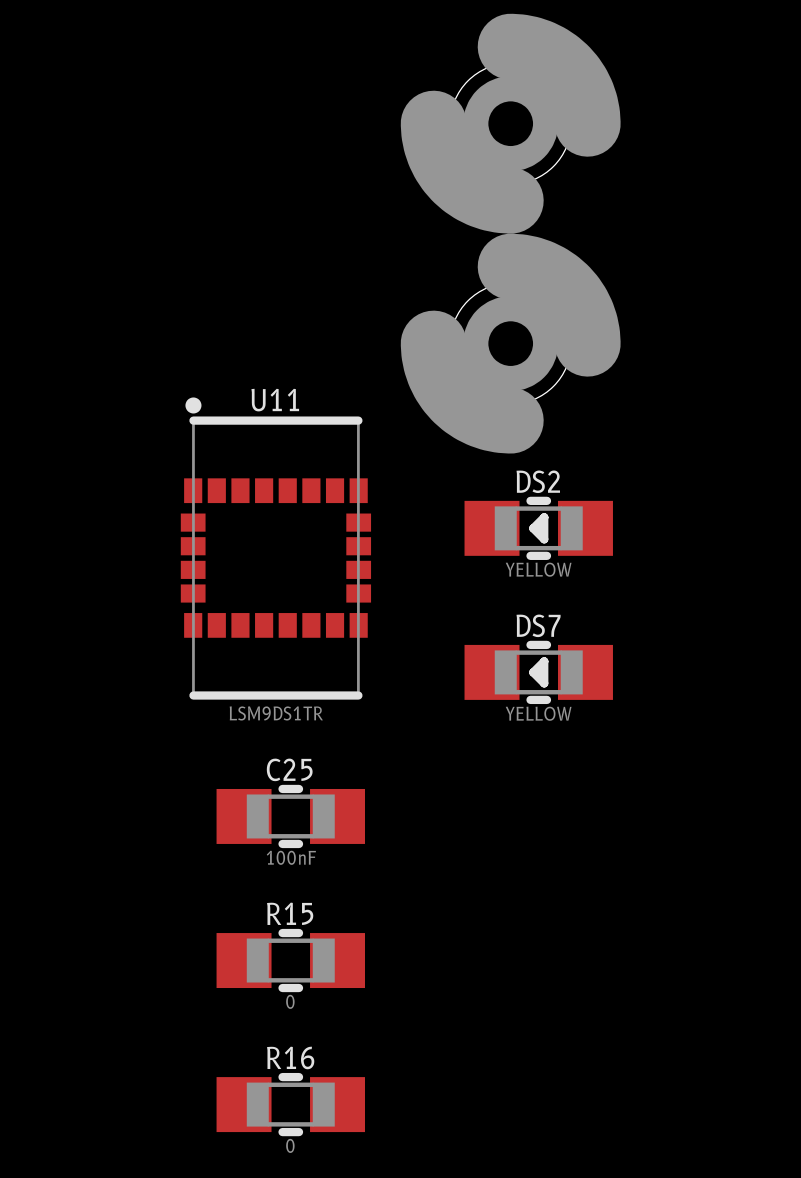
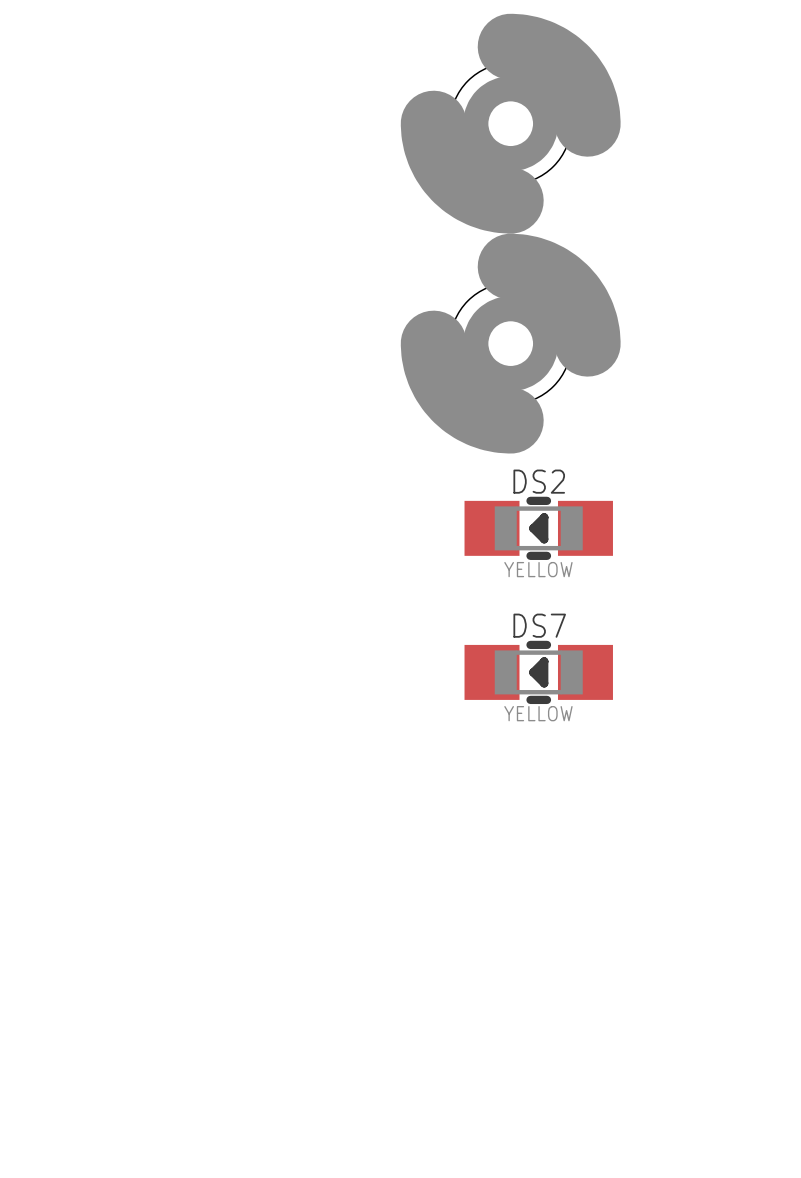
U11: LSM9DS1TR (275, 548) -> none
C25: 100nF (290, 816) -> none
R15: 0 (290, 960) -> none
R16: 0 (290, 1104) -> none

